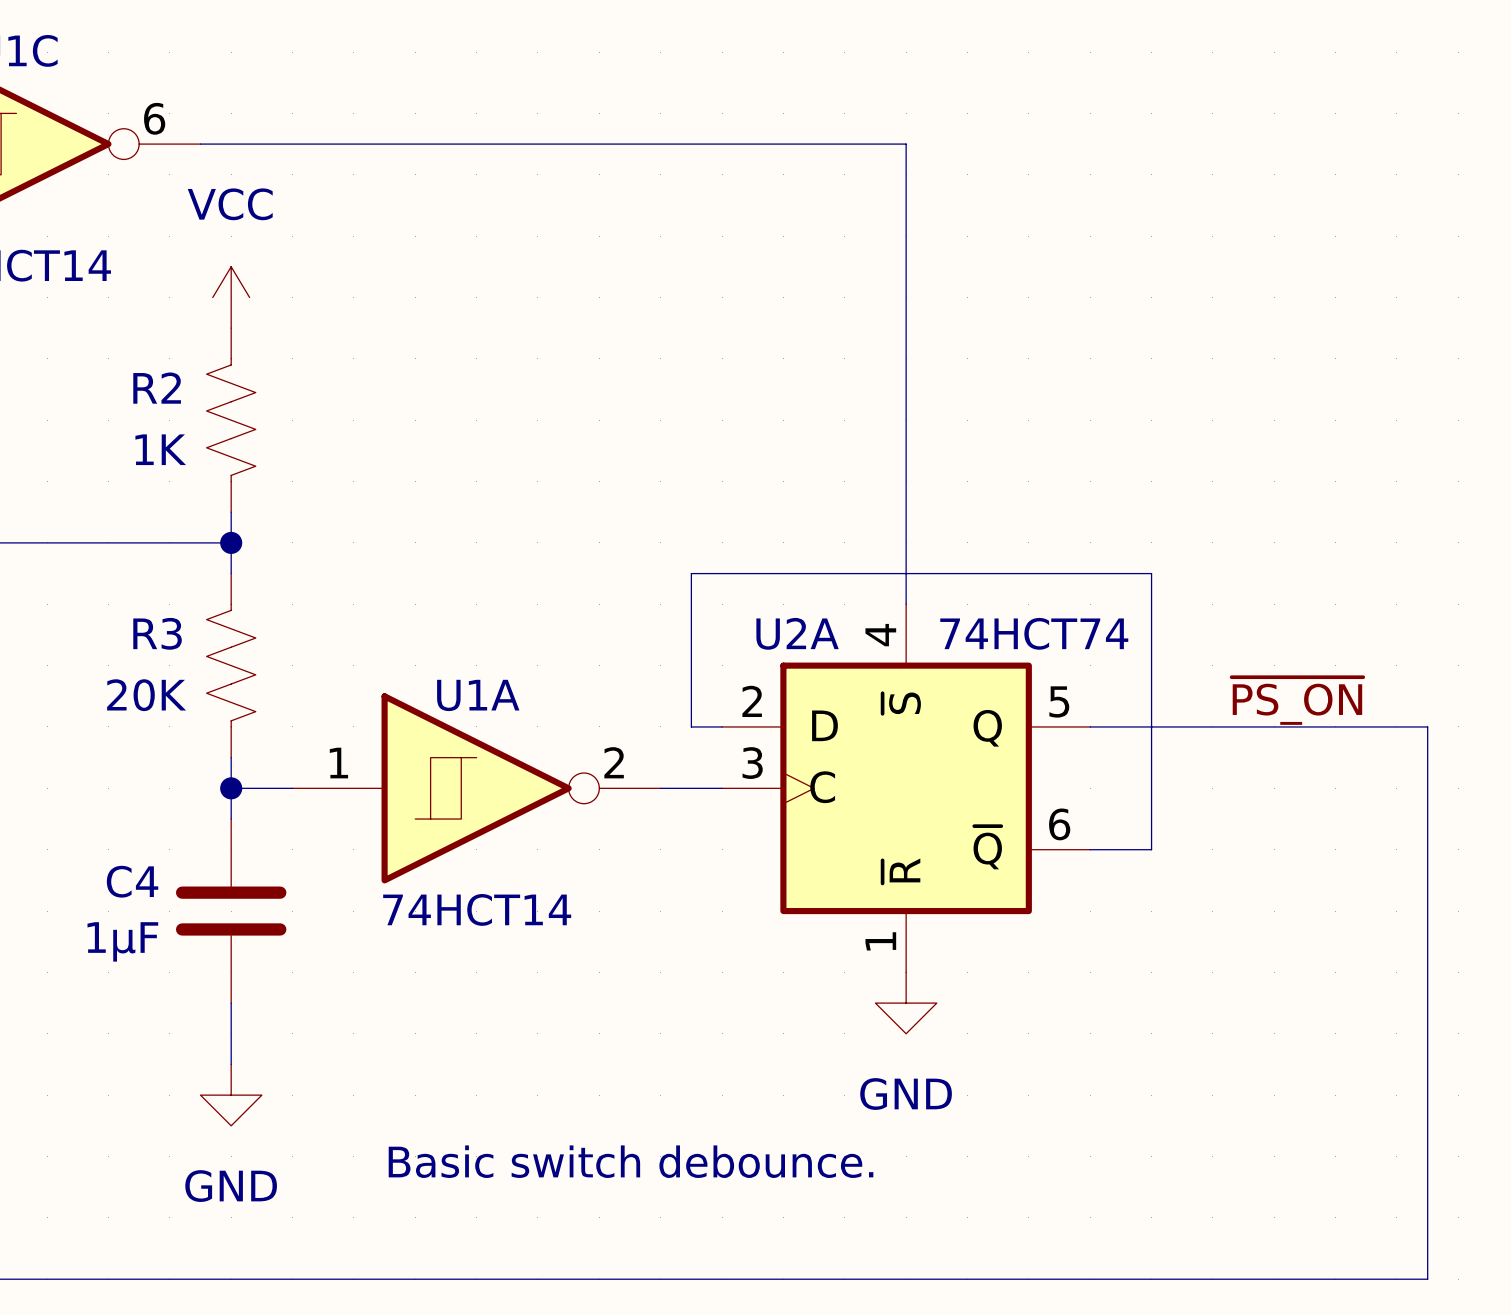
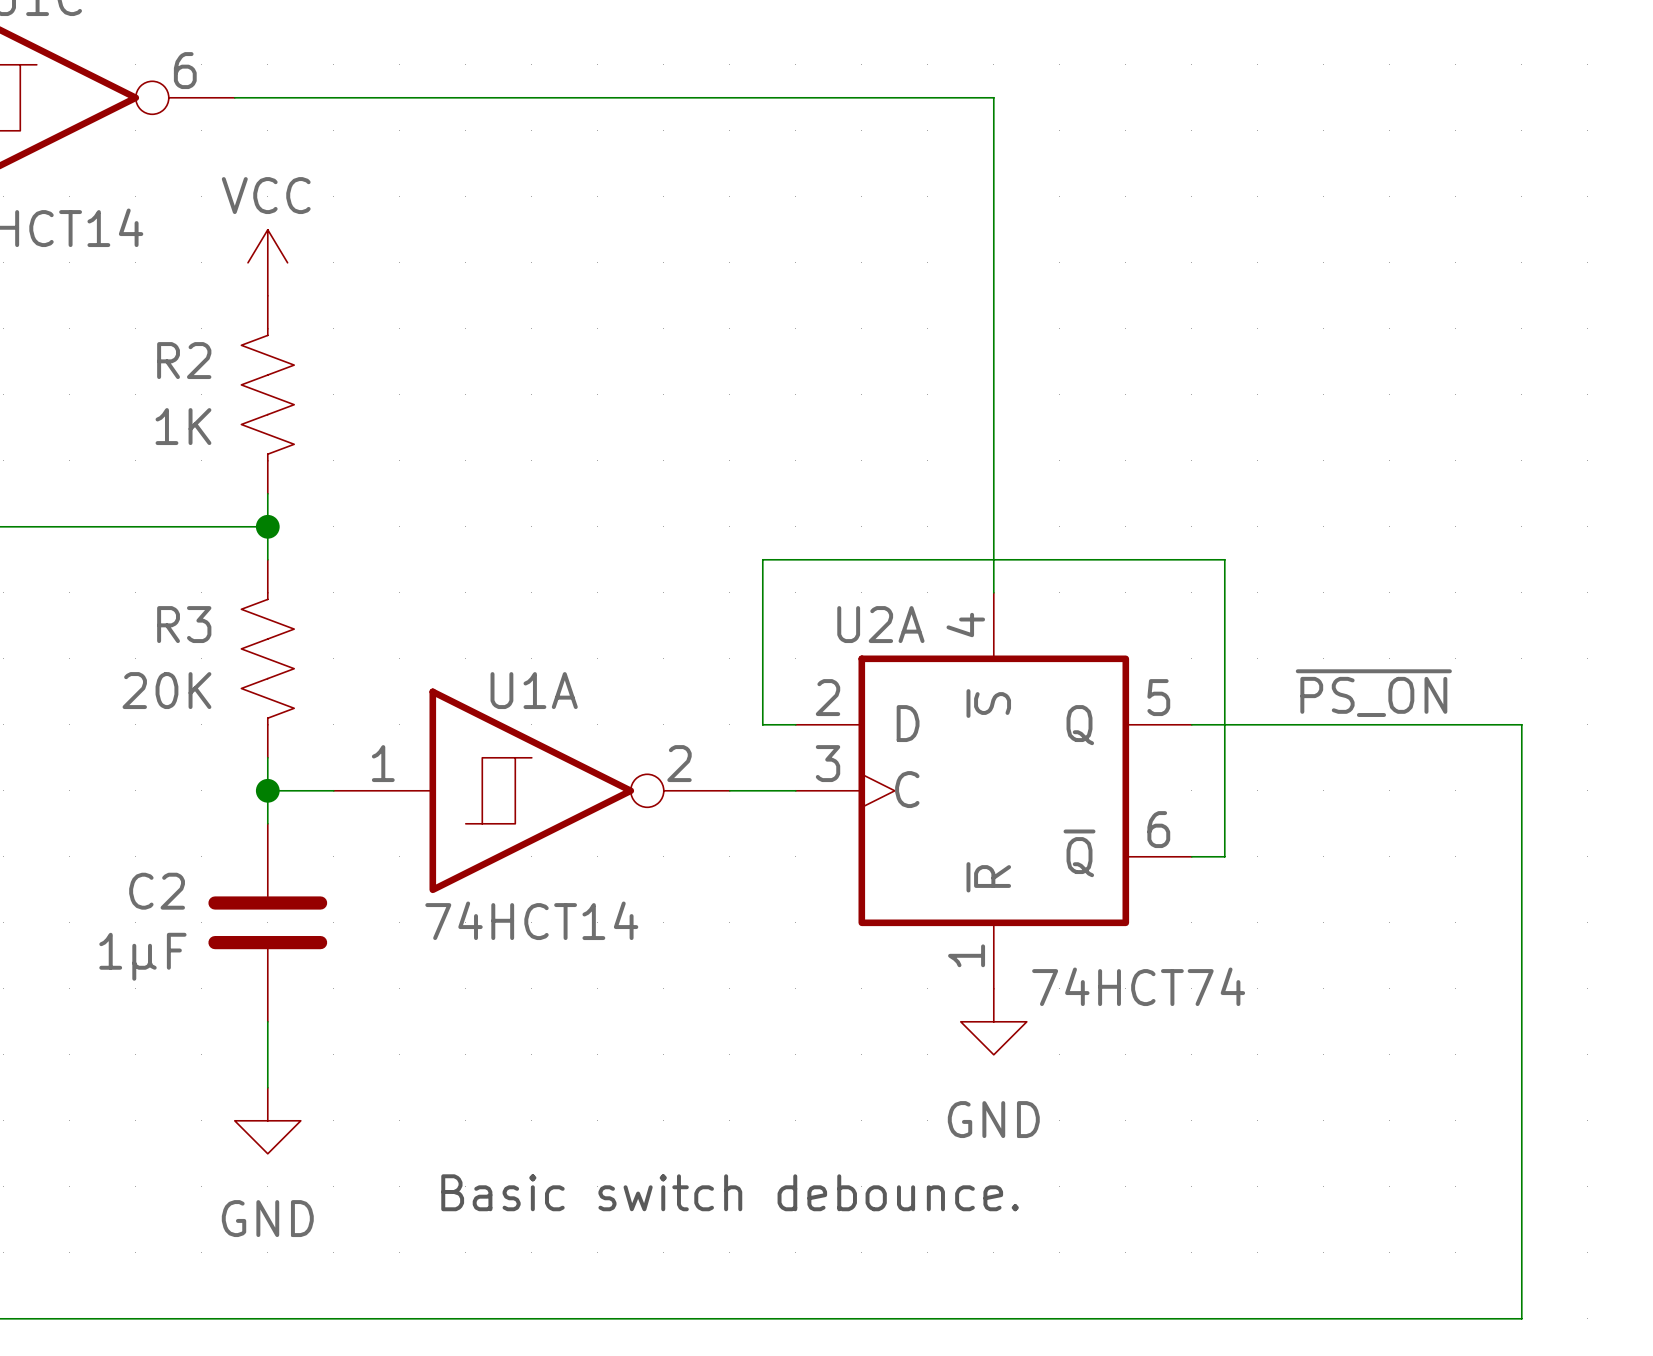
power symbol text position: VCC (230, 204) -> VCC (266, 195)
wire: (1120, 573) (1151, 573) (1151, 849) (1120, 849) -> (1224, 559) (1224, 856)
U2A value position: 74HCT74 (1034, 633) -> 74HCT74 (1138, 986)
label position: ~{PS_ON} (1297, 701) -> ~{PS_ON} (1373, 693)
wire: (1396, 726) (1427, 726) (1427, 1279) (1396, 1279) -> (1521, 724) (1521, 1318)
C4 name: C4 (132, 881) -> C2 (157, 891)

